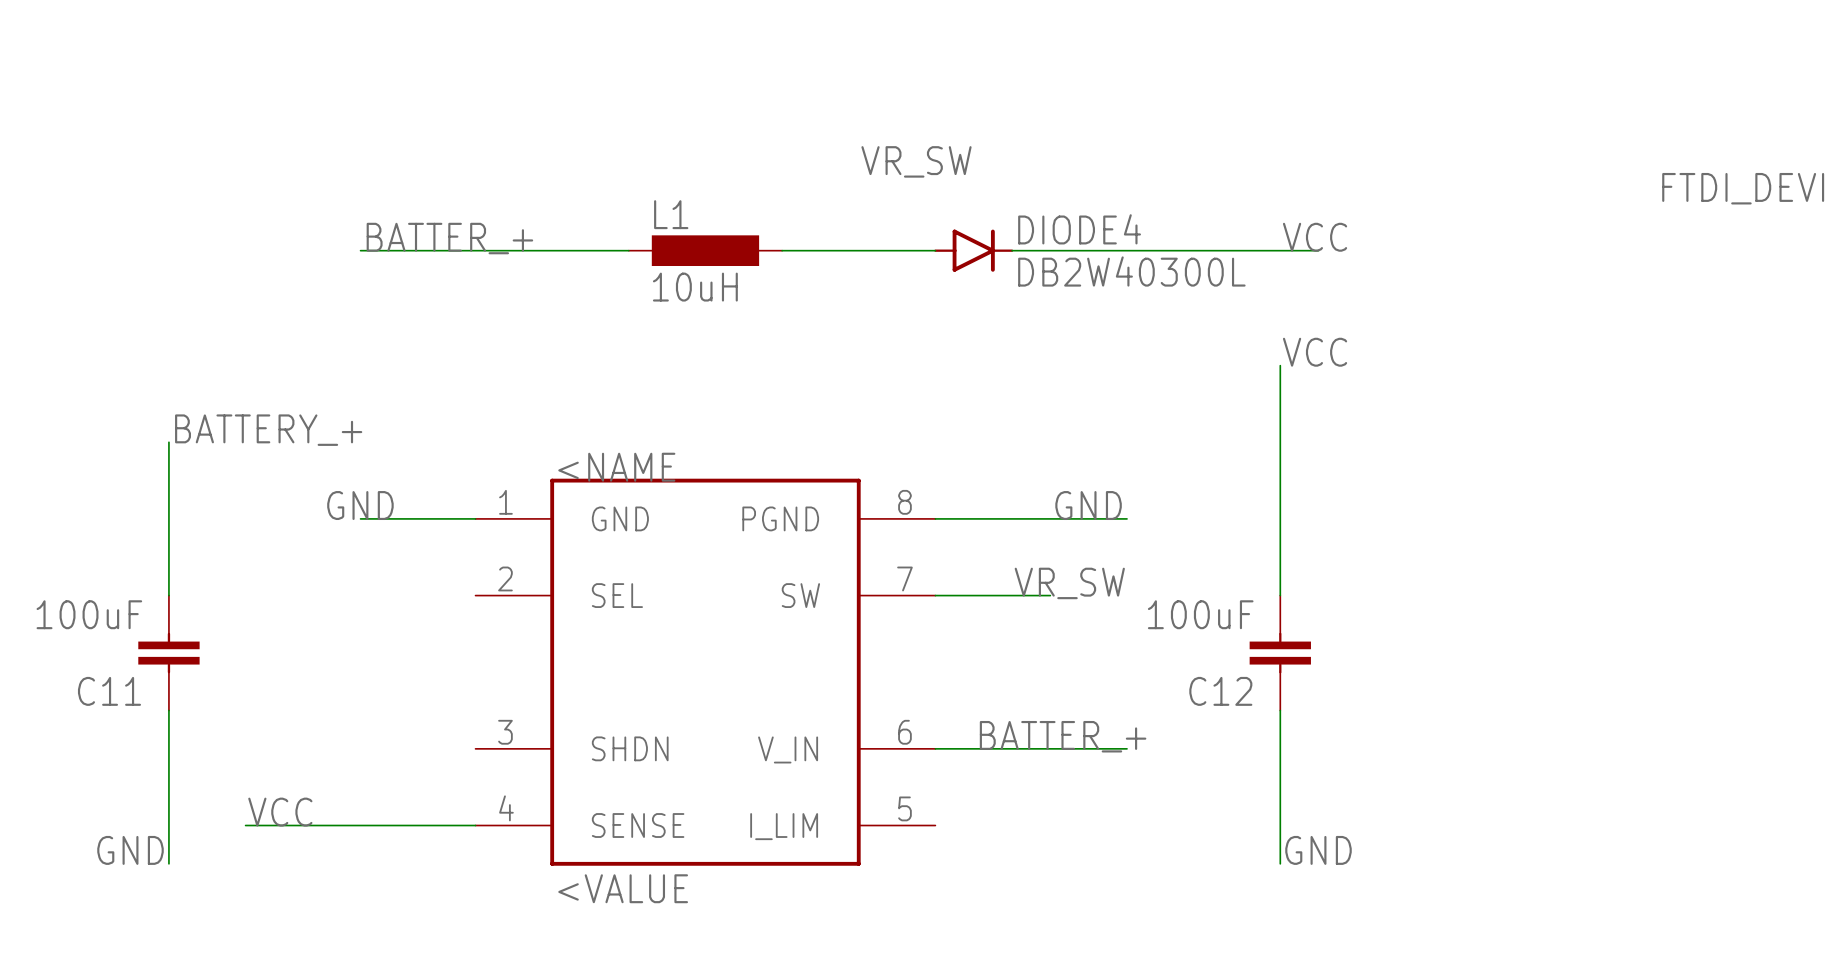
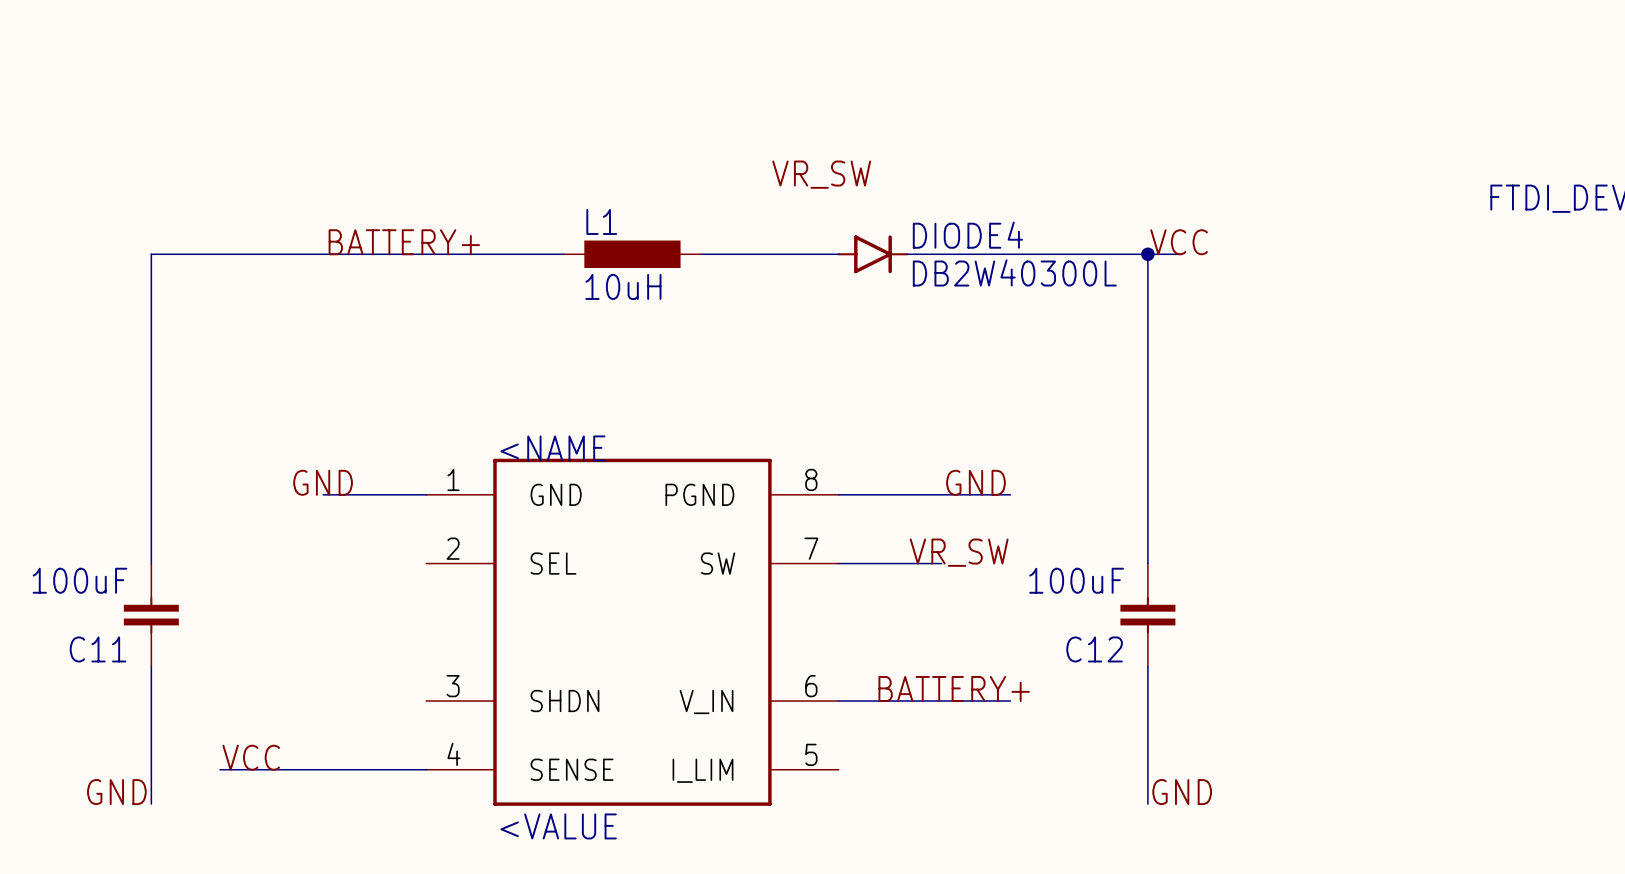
label: BATTER_+ (449, 238) -> BATTERY+ (404, 242)
wire: none -> (323, 254) (151, 254) (151, 426)
wire: none -> (1147, 254) (1147, 357)
junction: none -> (1147, 254)
label: VCC (1315, 352) -> none
label: BATTERY_+ (268, 430) -> none
label: BATTER_+ (1063, 736) -> BATTERY+ (954, 688)

